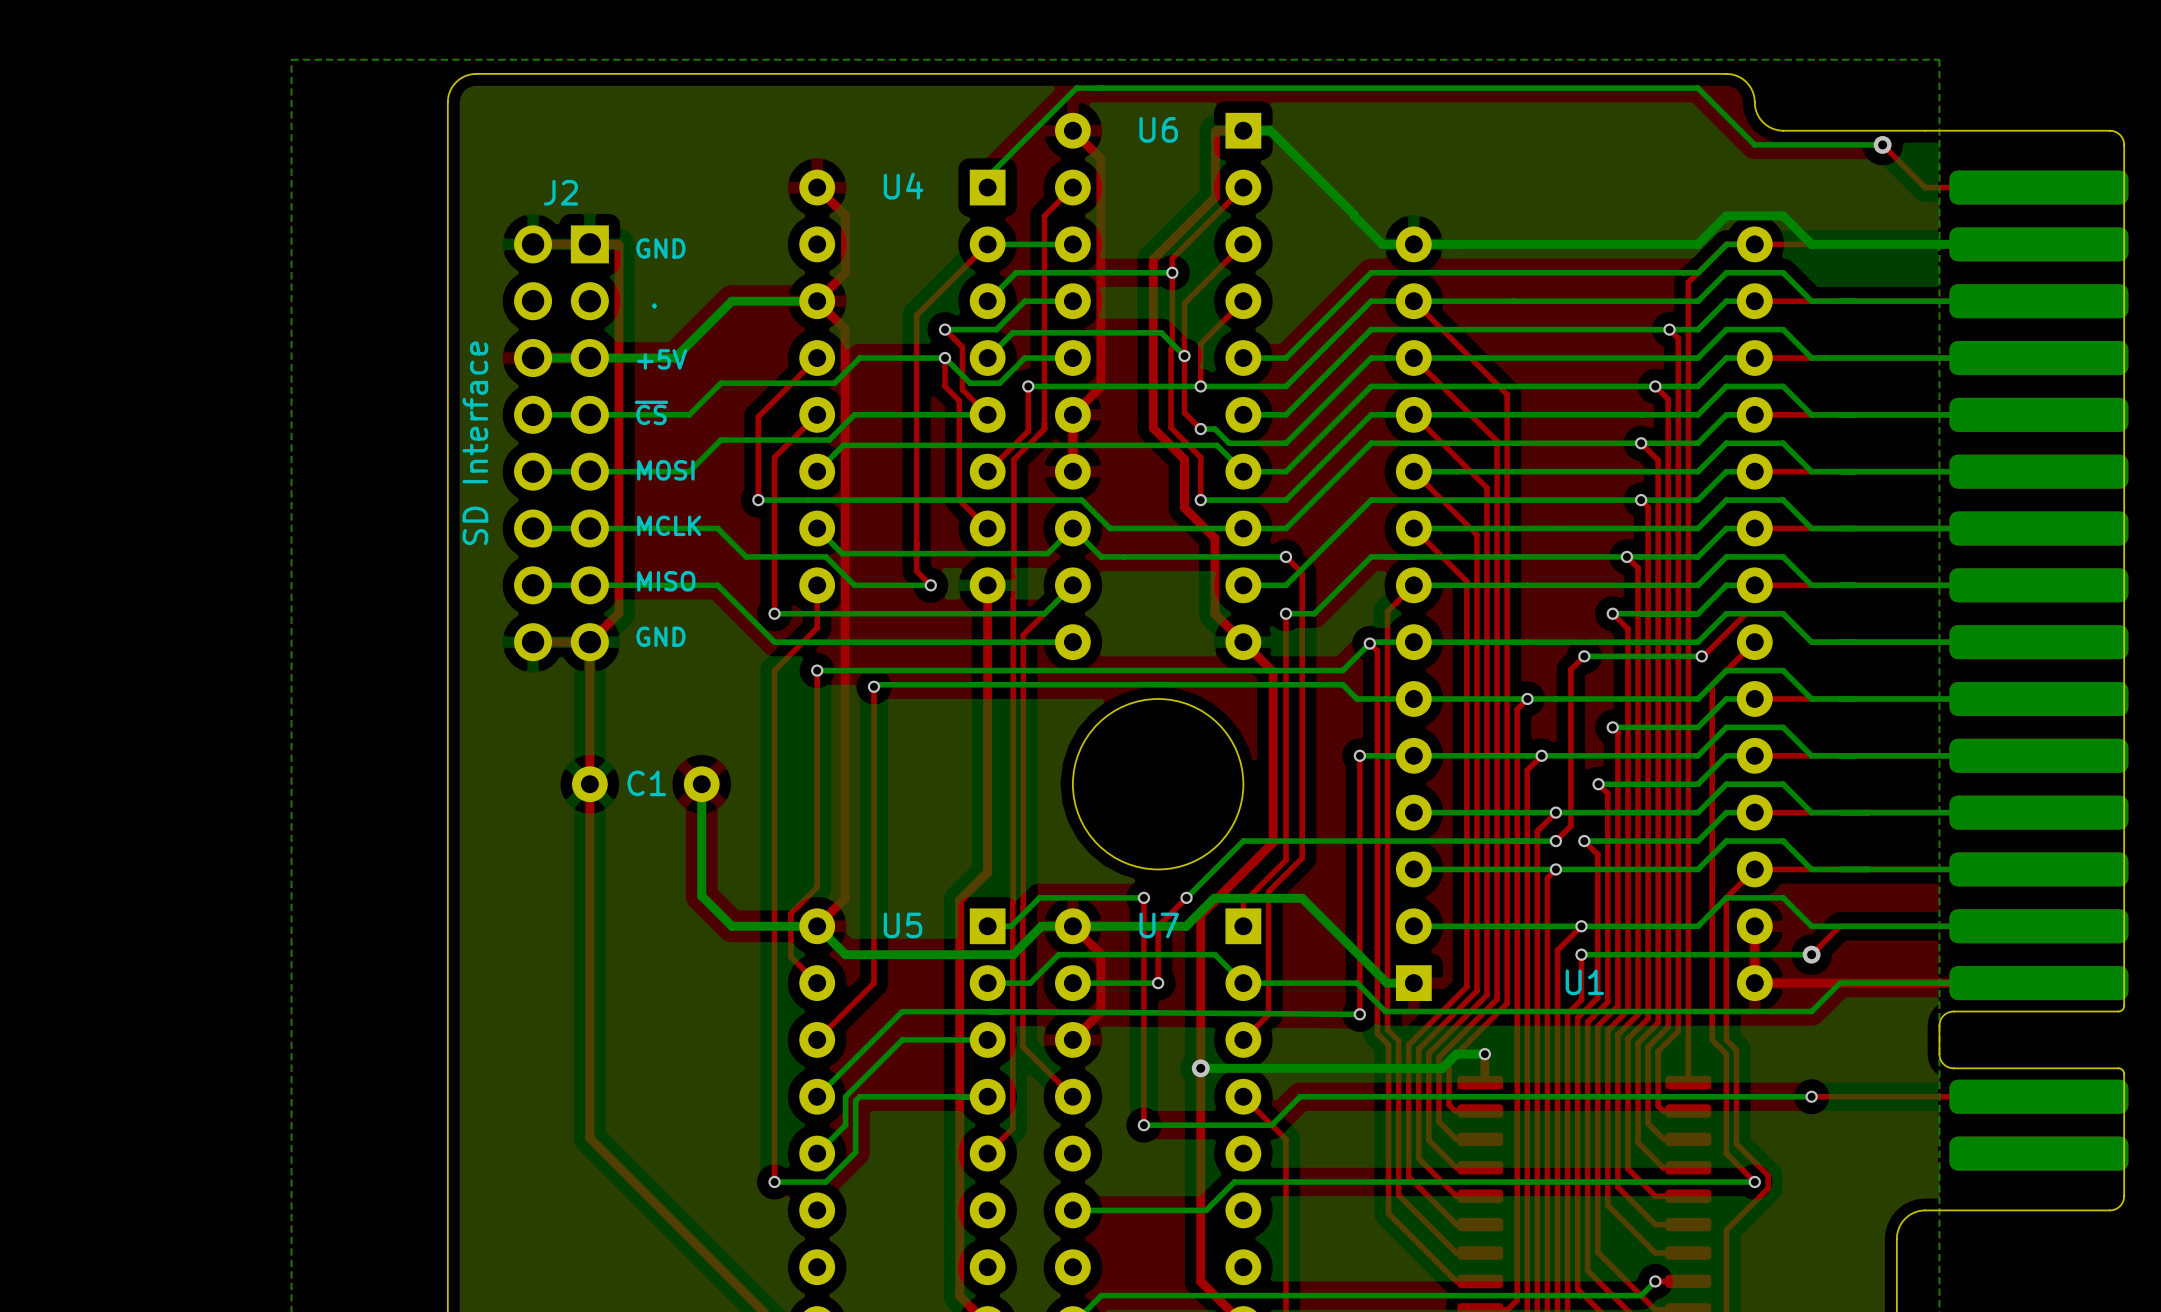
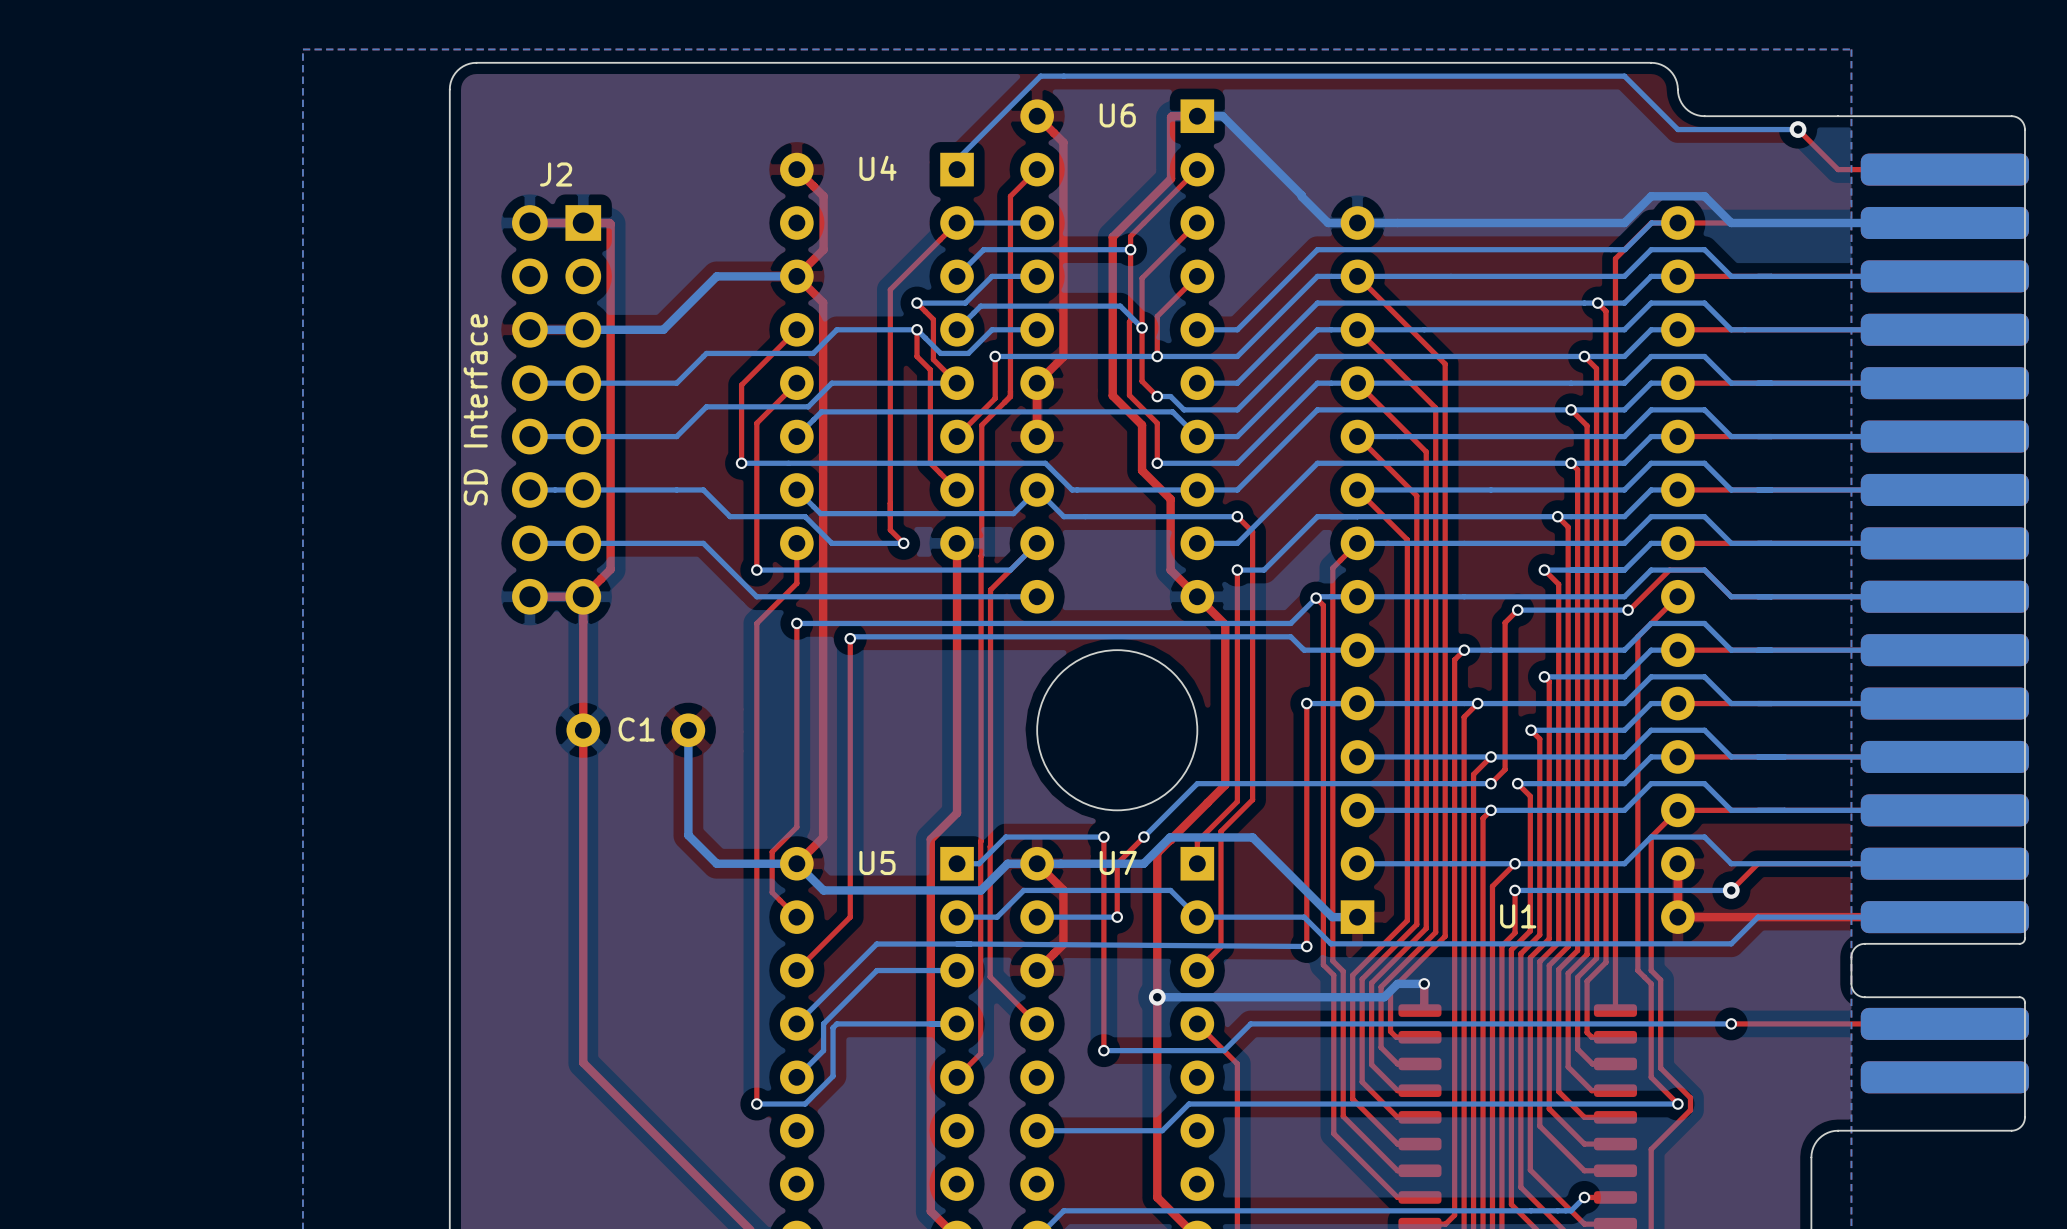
text: GND (660, 248) -> none
text: · (654, 305) -> none
text: +5V (662, 359) -> none
text: ~{CS} (651, 412) -> none
text: MOSI (665, 470) -> none
text: MCLK (669, 525) -> none
text: MISO (666, 581) -> none
text: GND (660, 636) -> none

